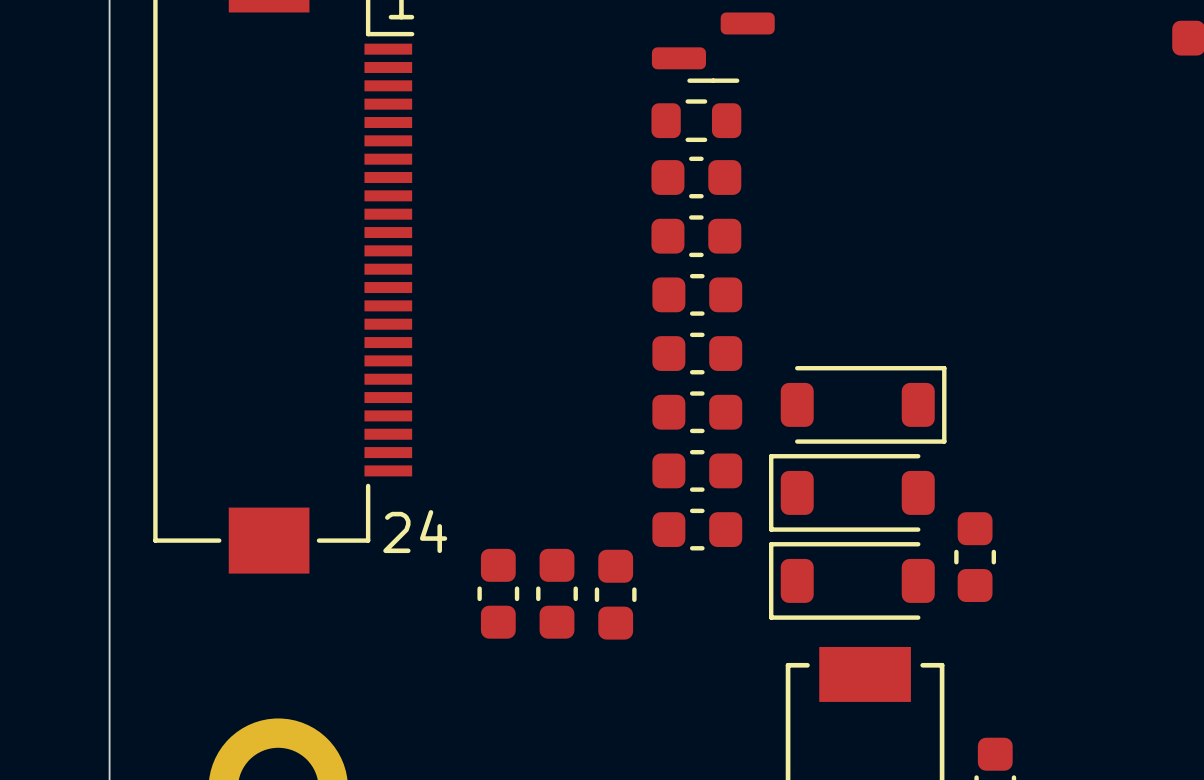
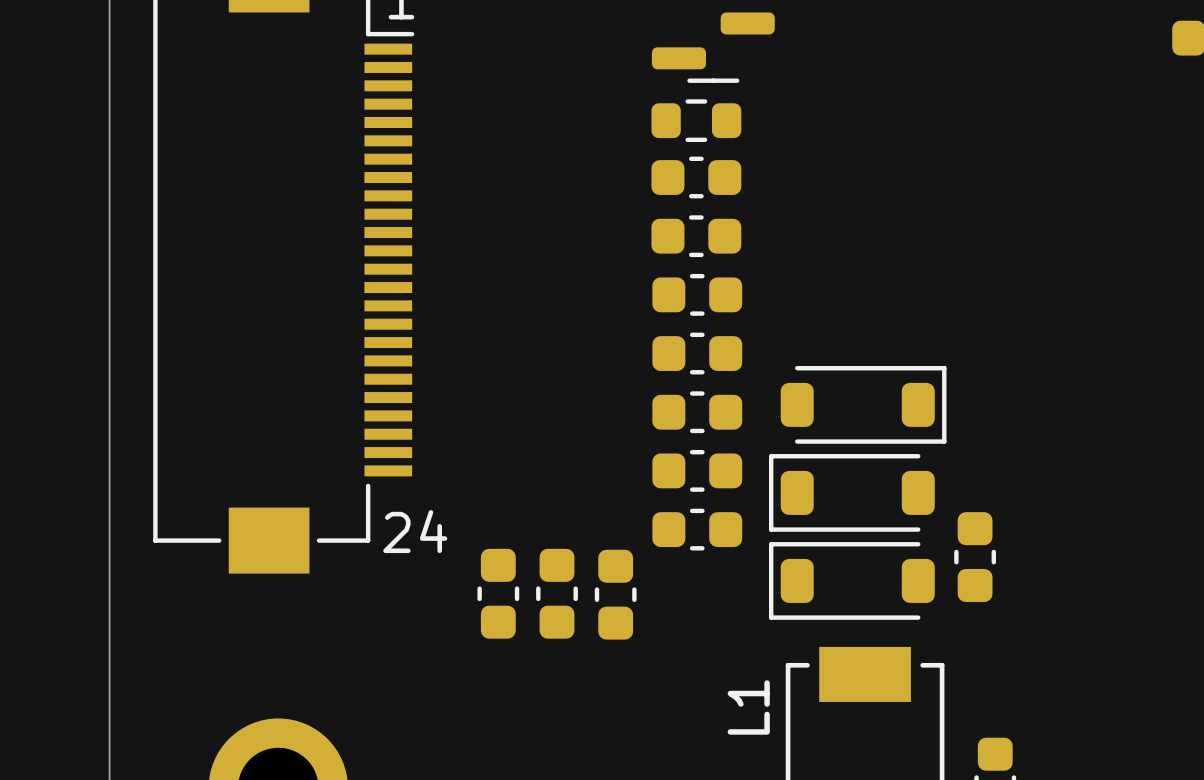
L1 name: none -> L1 (748, 707)

